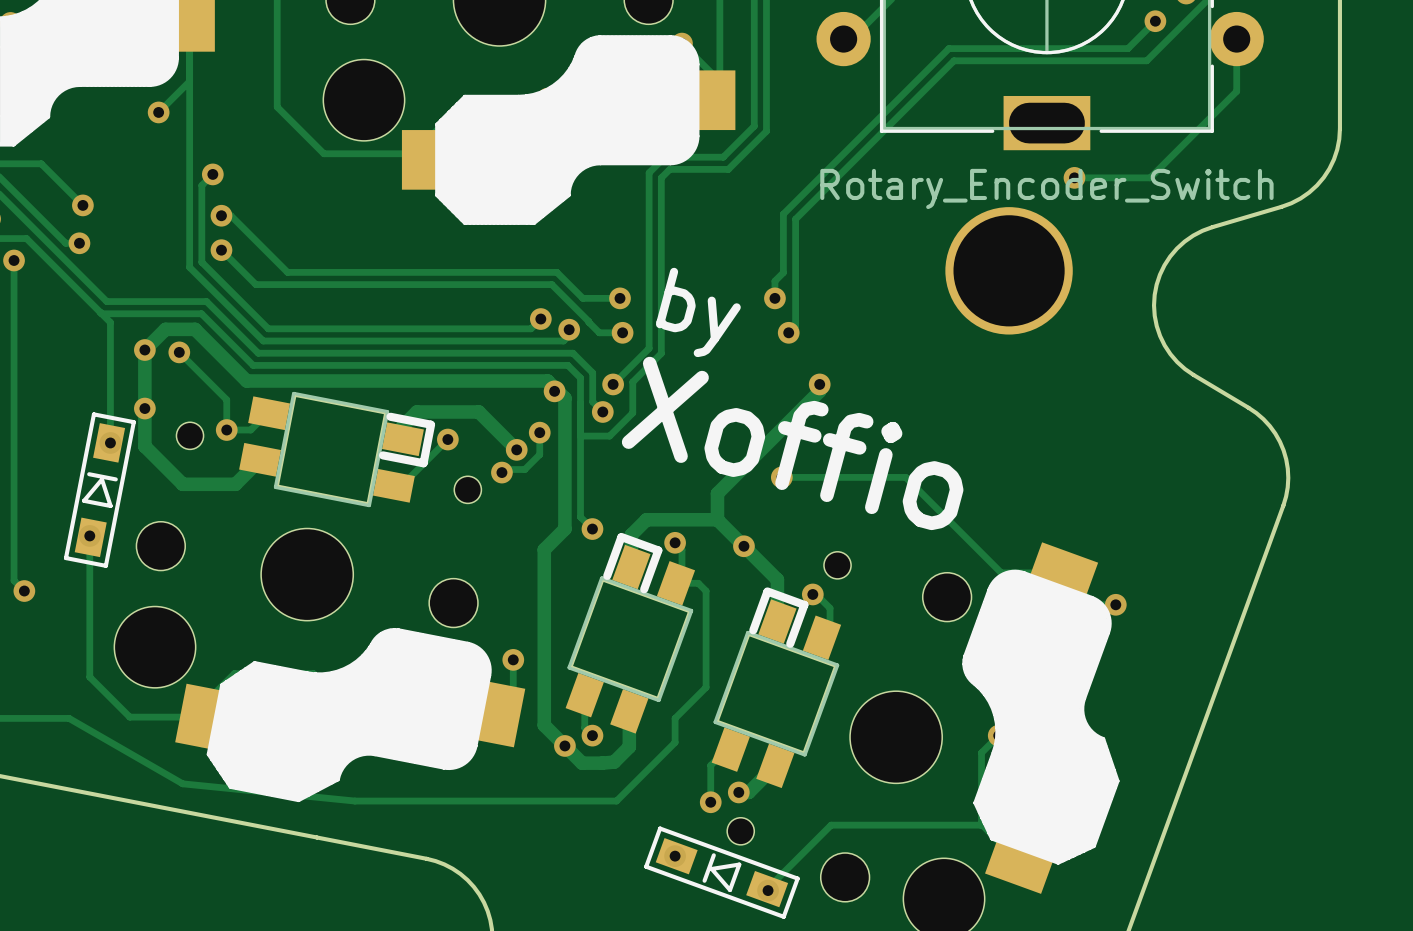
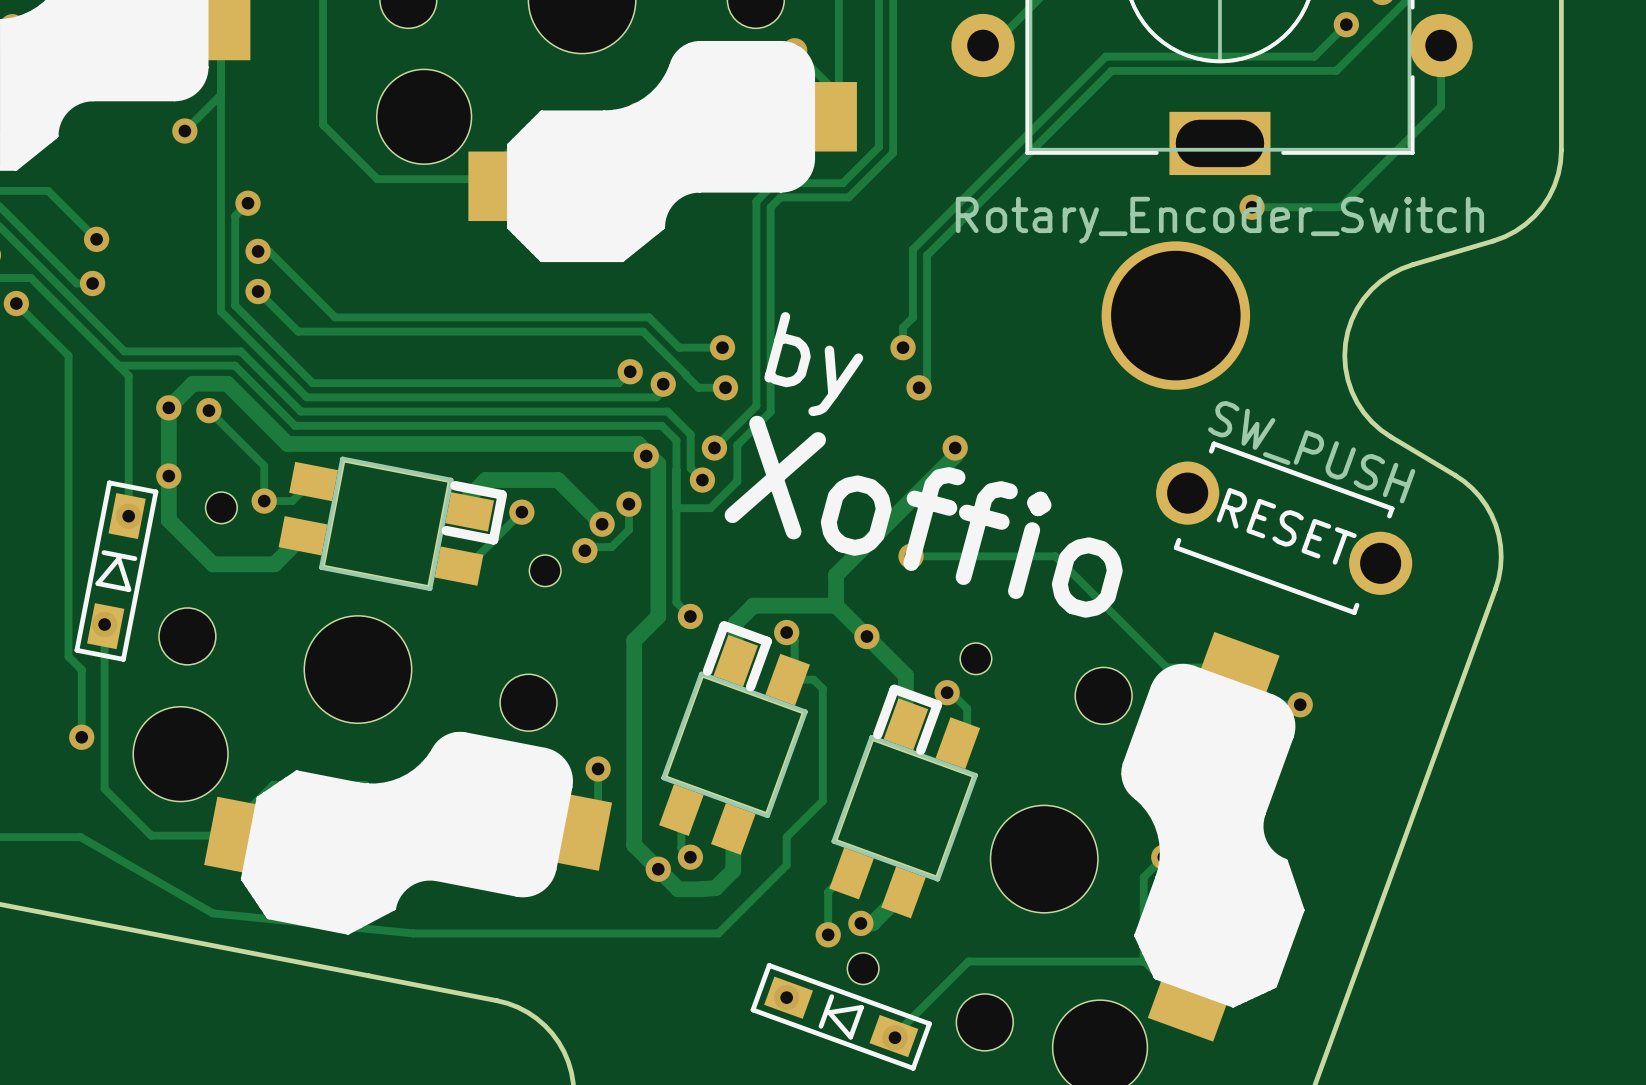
track: (14, 260) (14, 580) (24, 591) -> (16, 303) (68, 355) (68, 656) (81, 669) (81, 737)
part: none -> SW_PUSH (1284, 528)
via position: (24, 591) -> (81, 737)

